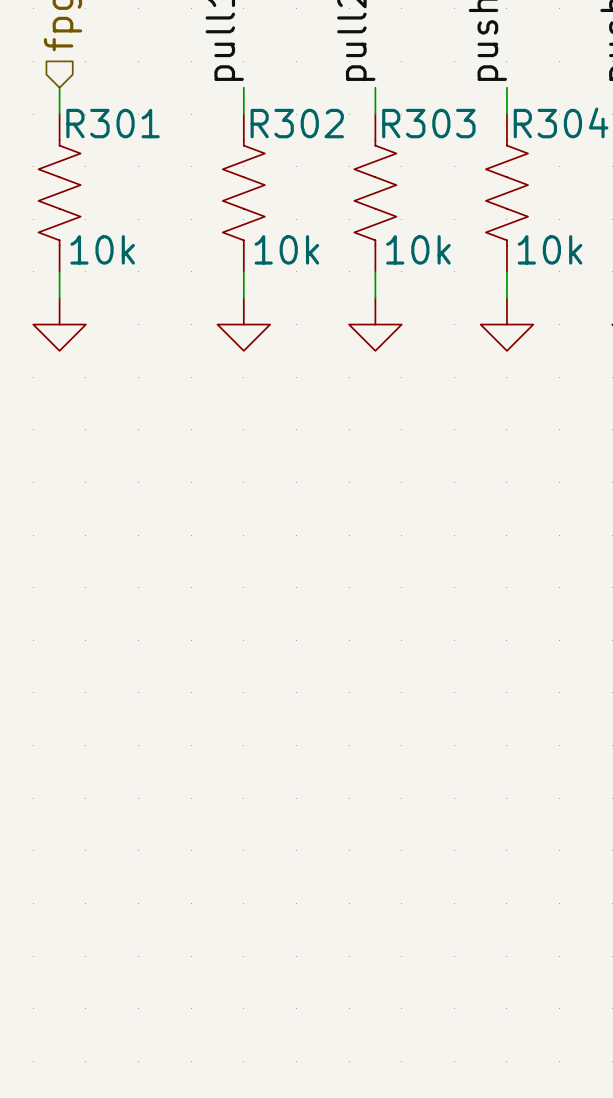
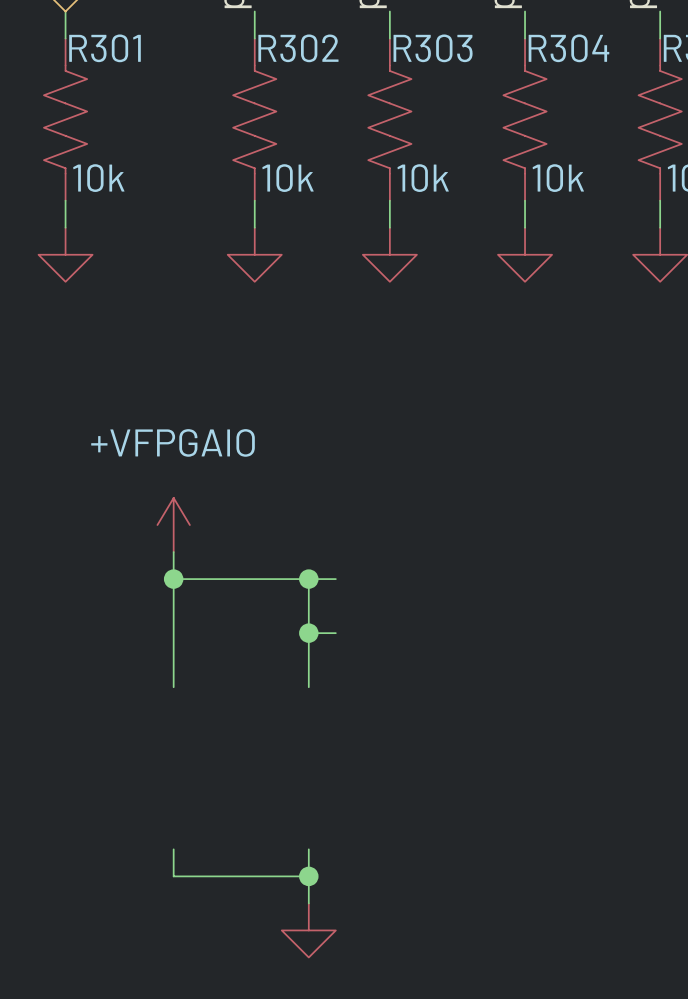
power symbol: none -> +VFPGAIO (173, 525)
wire: none -> (173, 552) (173, 687)
wire: none -> (173, 579) (335, 579)
junction: none -> (173, 579)
wire: none -> (308, 579) (308, 687)
junction: none -> (308, 579)
wire: none -> (308, 633) (335, 633)
junction: none -> (308, 633)
wire: none -> (173, 849) (173, 876) (308, 876)
wire: none -> (308, 849) (308, 903)
junction: none -> (308, 876)
power symbol: none -> (308, 930)

